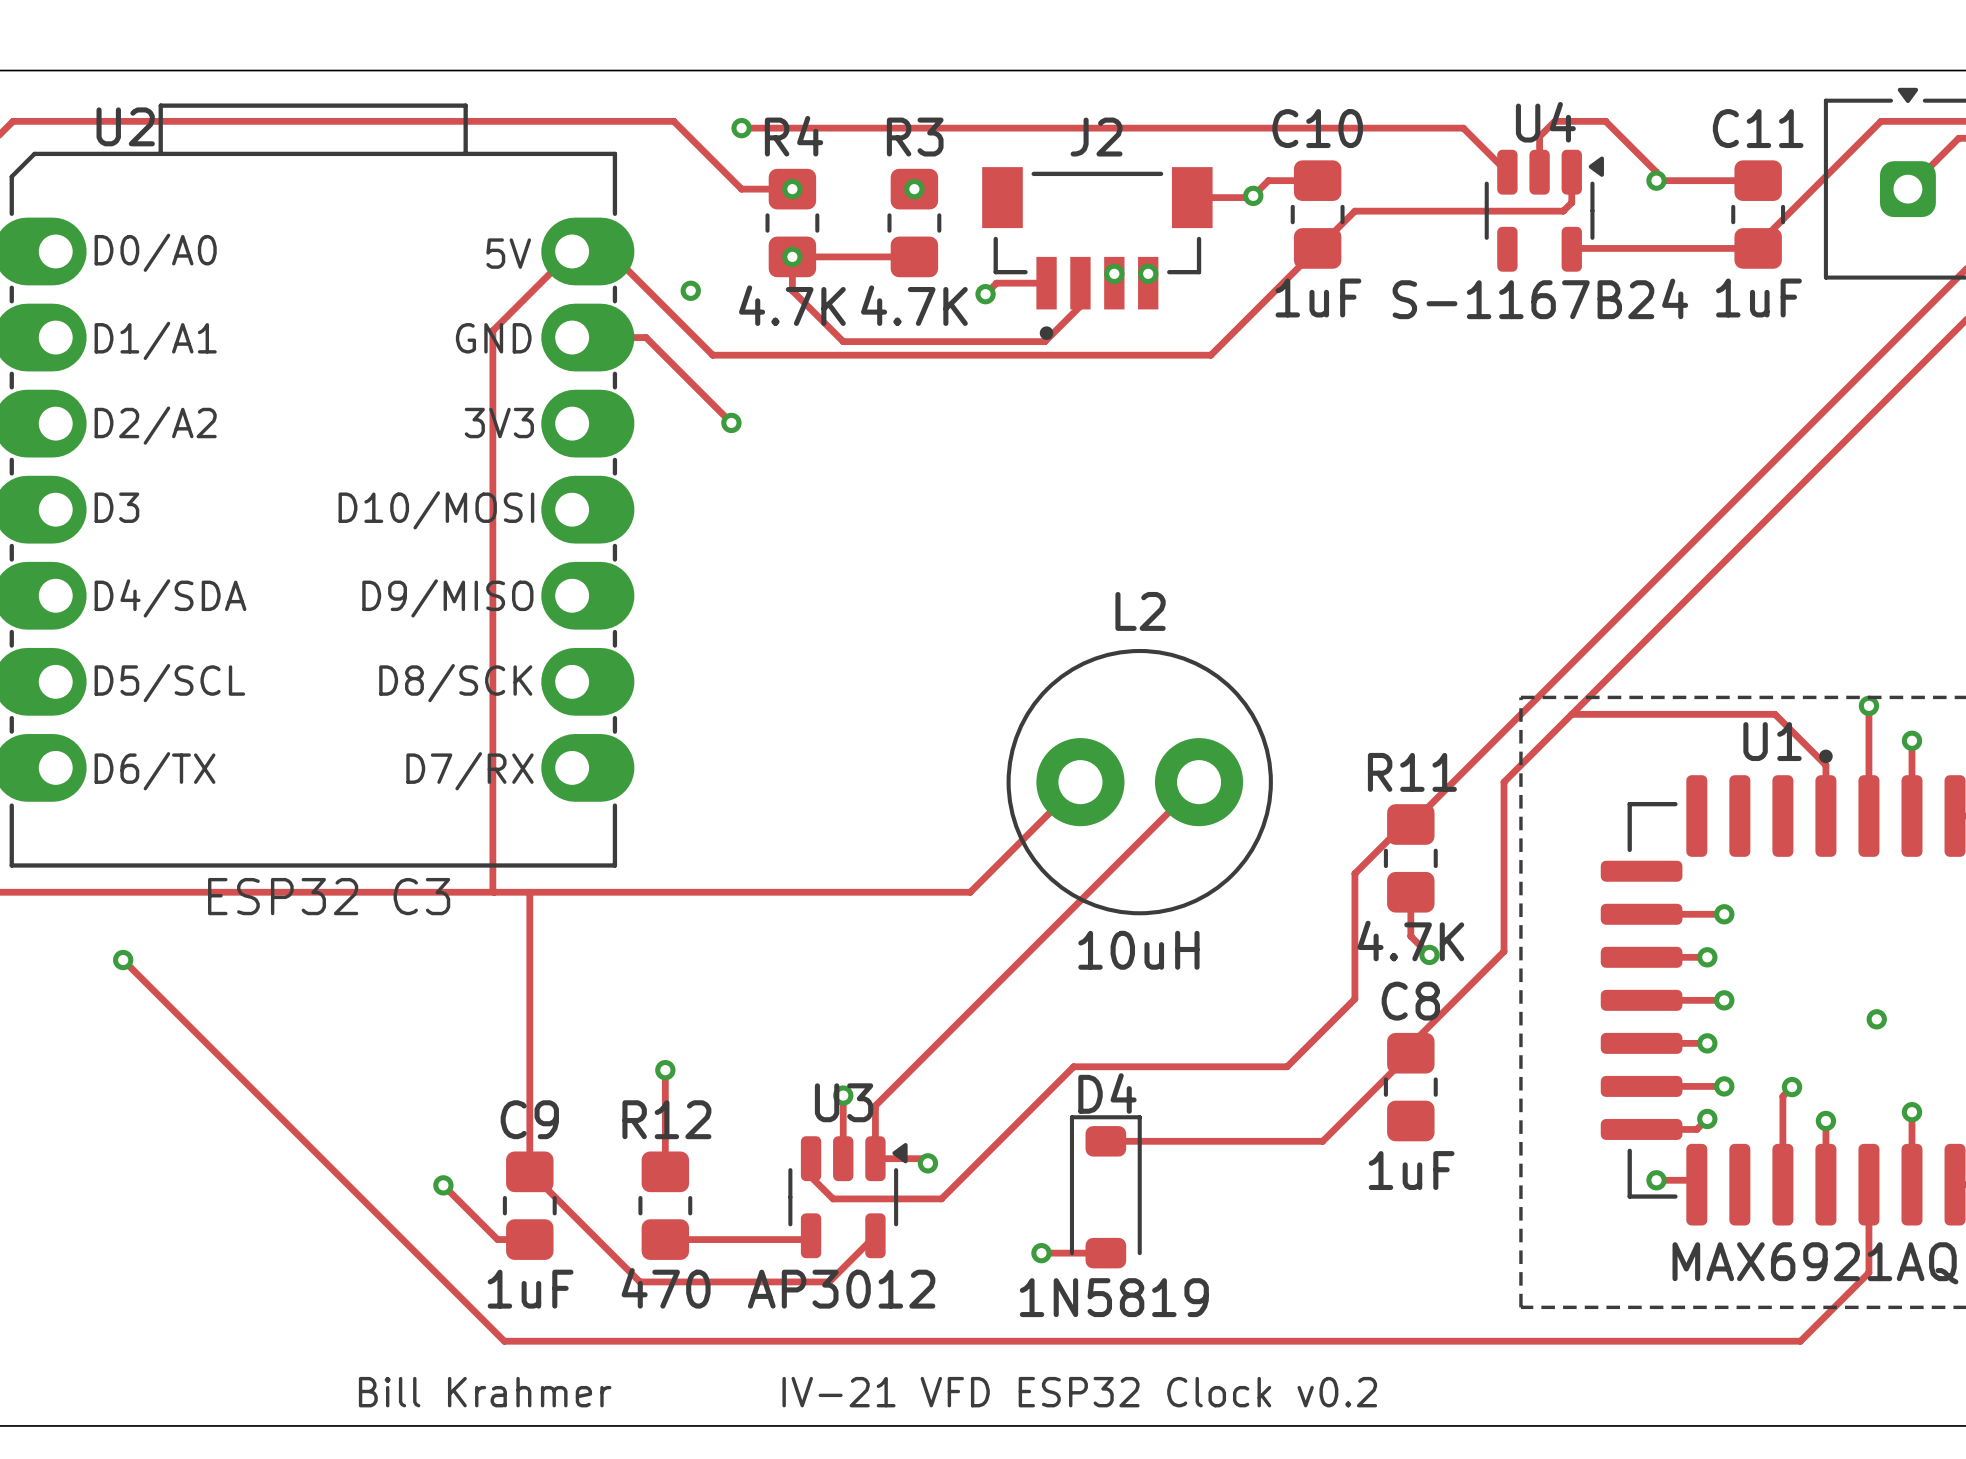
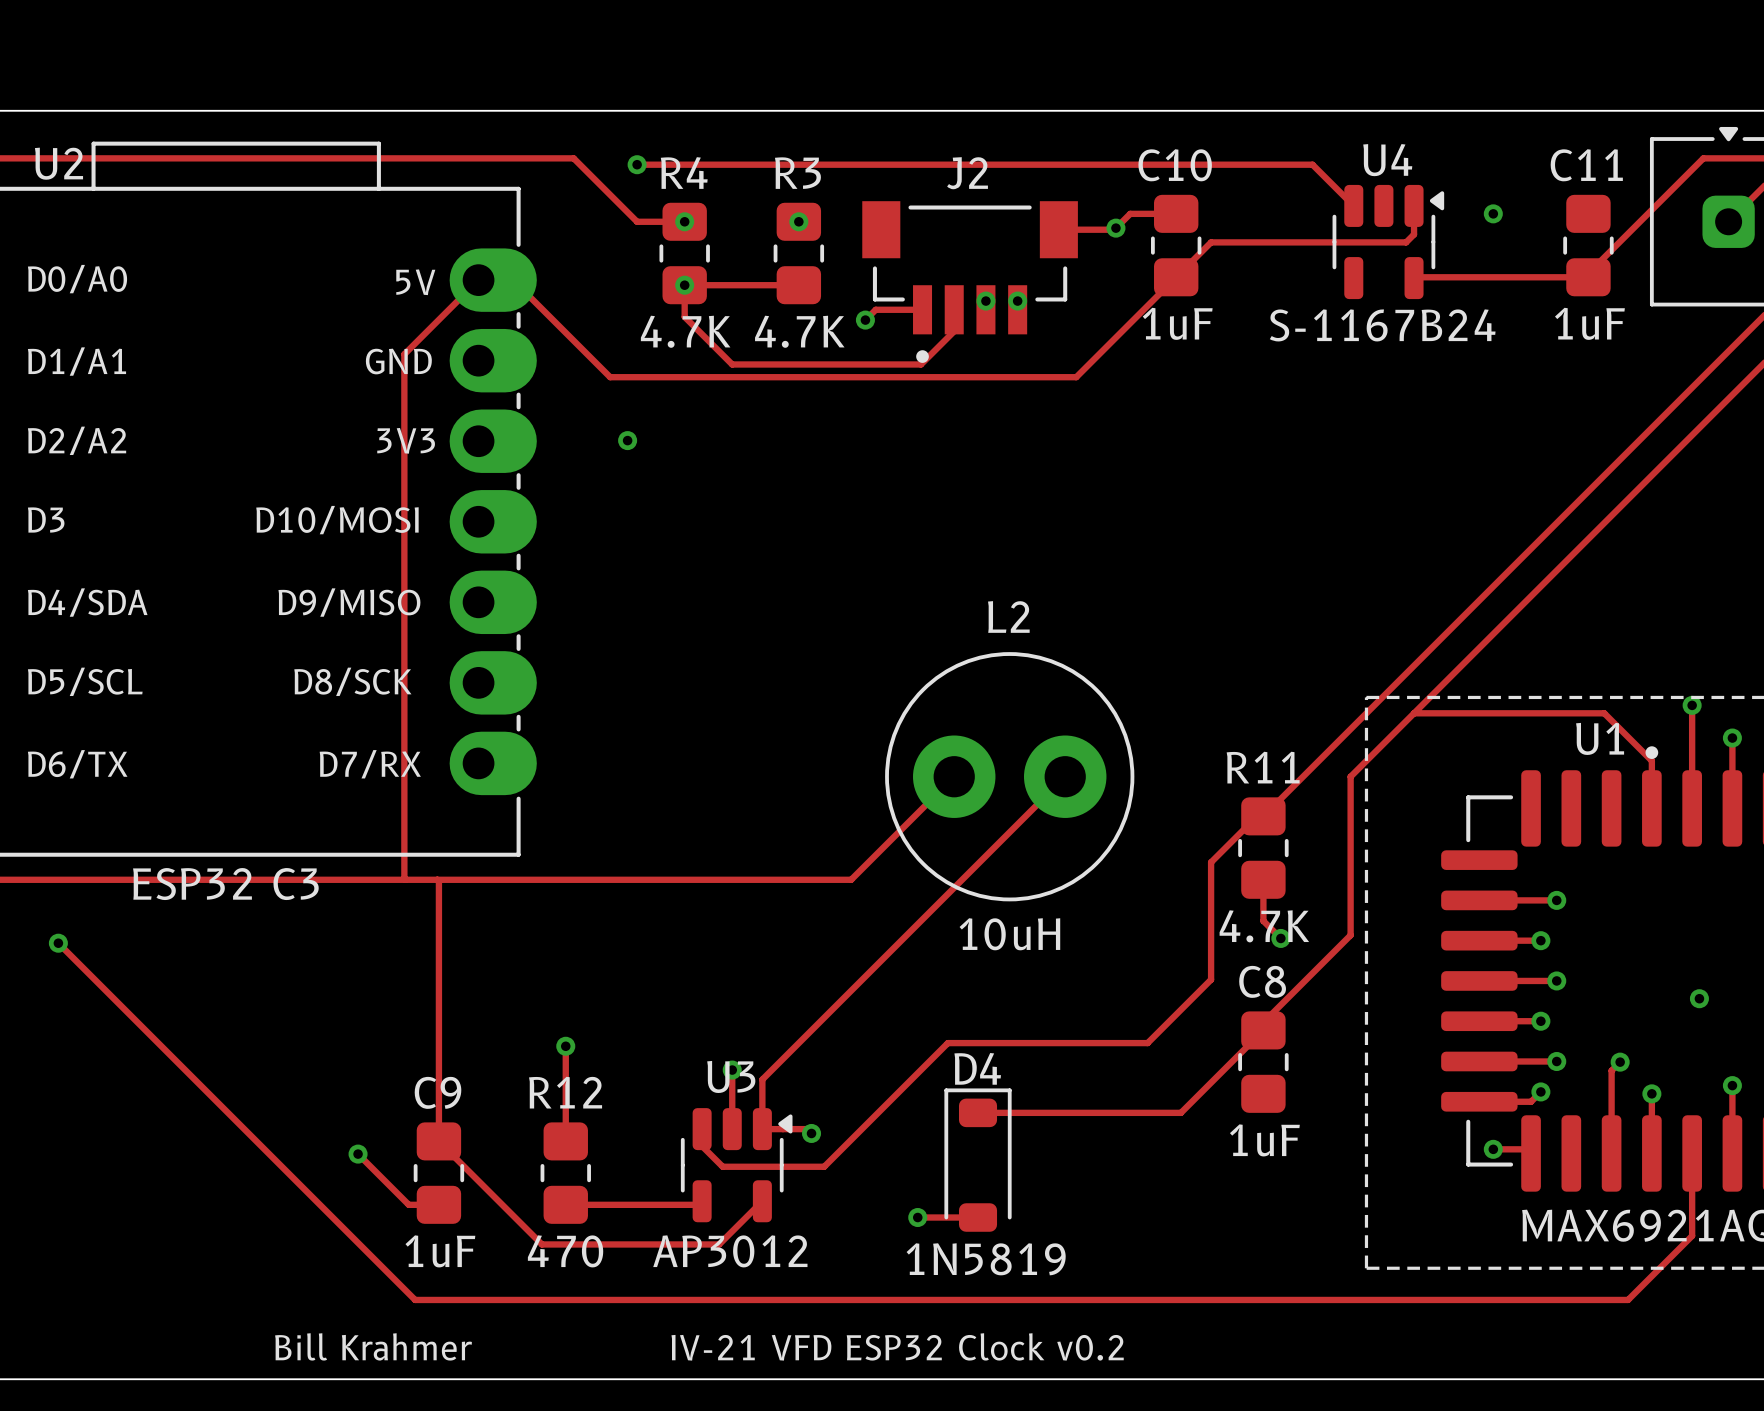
track: (1539, 172) (1539, 136) (1554, 121) (1605, 121) (1656, 172) (1656, 180) (1758, 180) -> none
via: (690, 290) -> none
track: (572, 337) (646, 337) (731, 422) -> none

